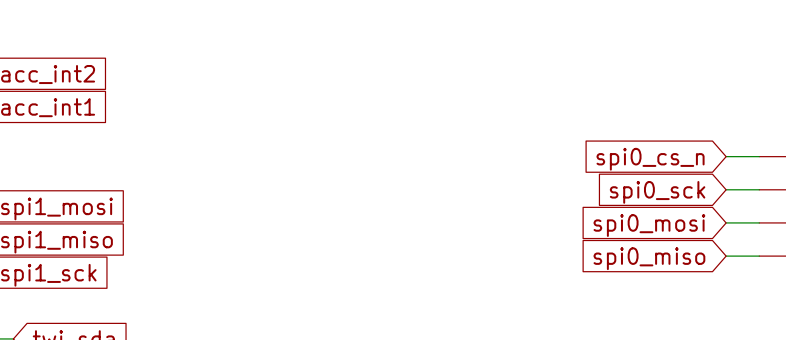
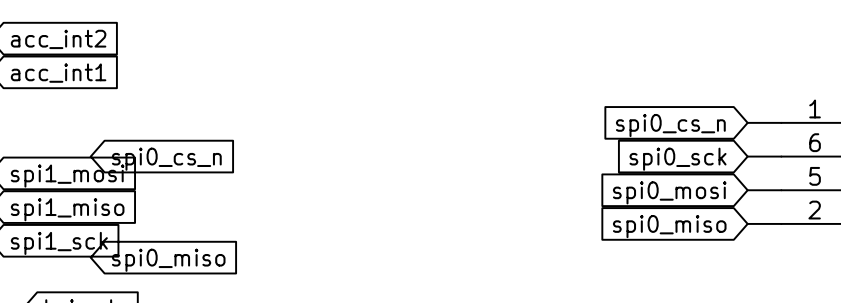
global label: none -> spi0_cs_n (166, 159)
global label: none -> spi0_miso (168, 260)

